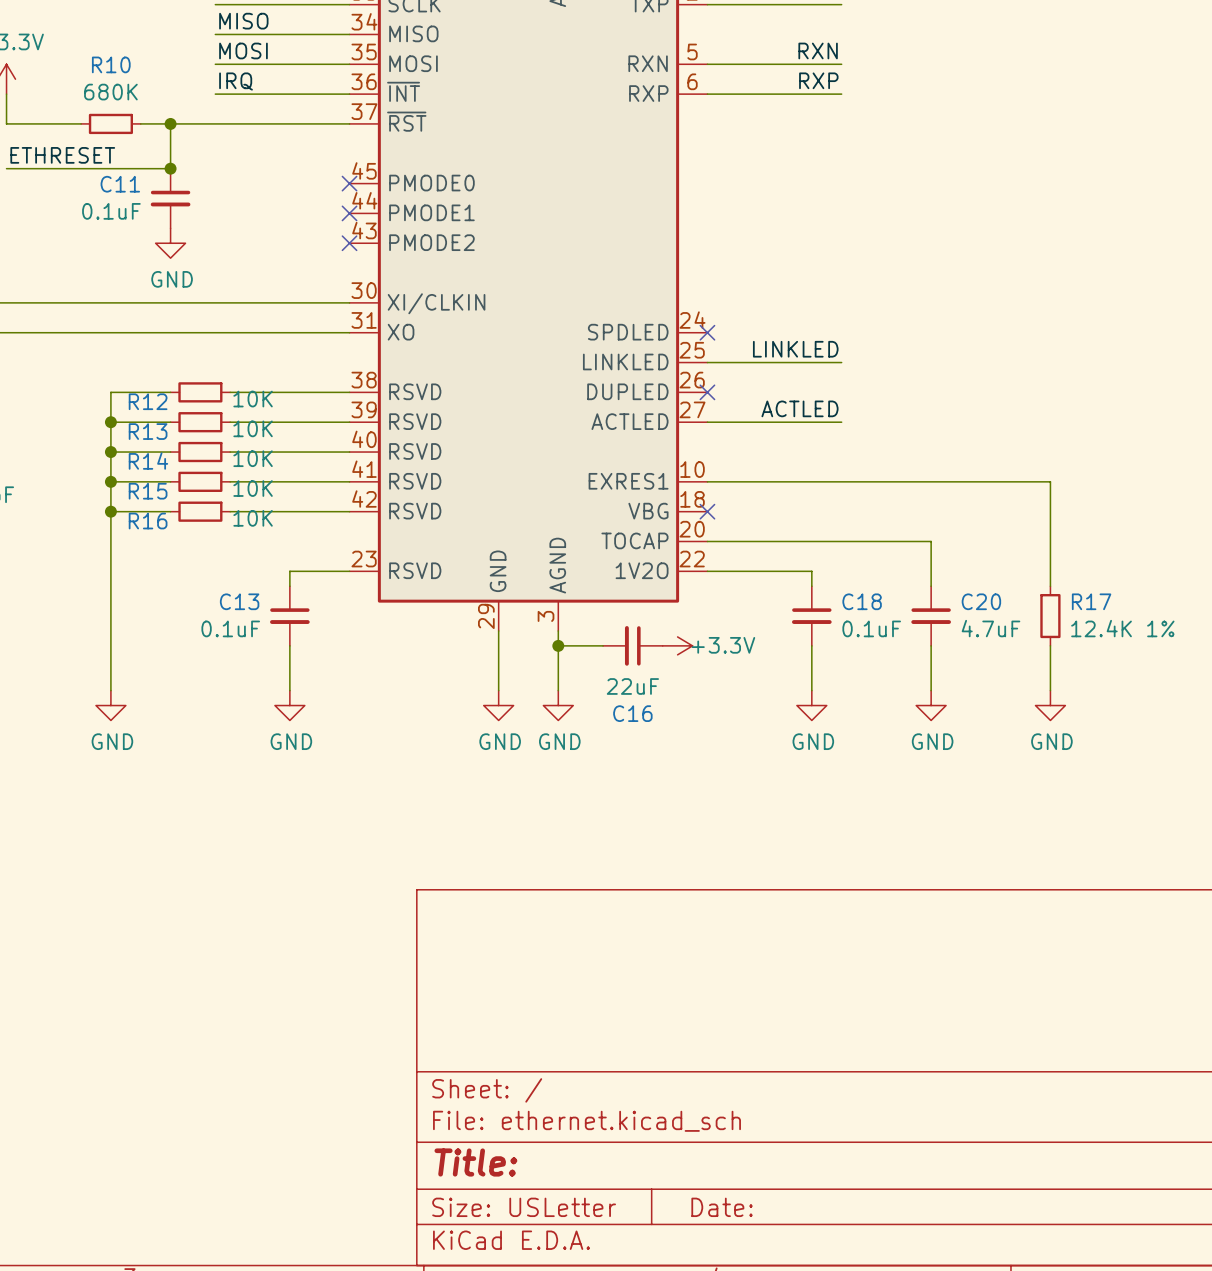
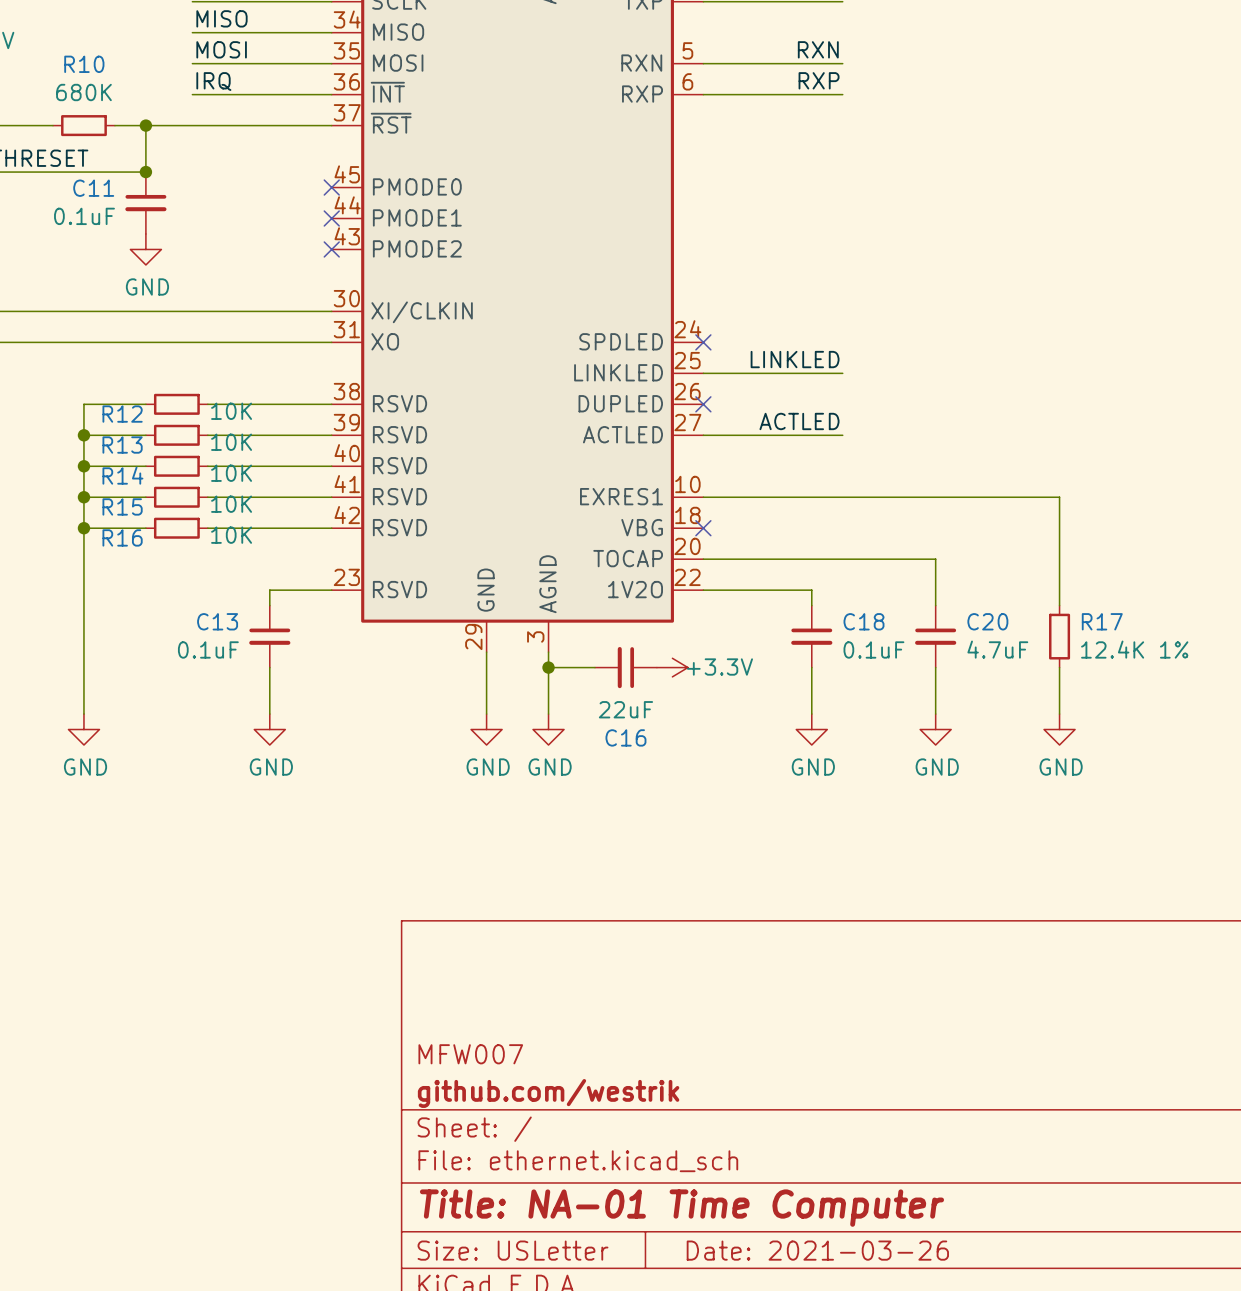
title block: none -> MFW007 (470, 1054)
title block: none -> github.com/westrik (548, 1093)
title block: Title: (475, 1162) -> Title: NA-01 Time Computer (681, 1208)
title block: Date: (722, 1207) -> Date: 2021-03-26 (817, 1250)

